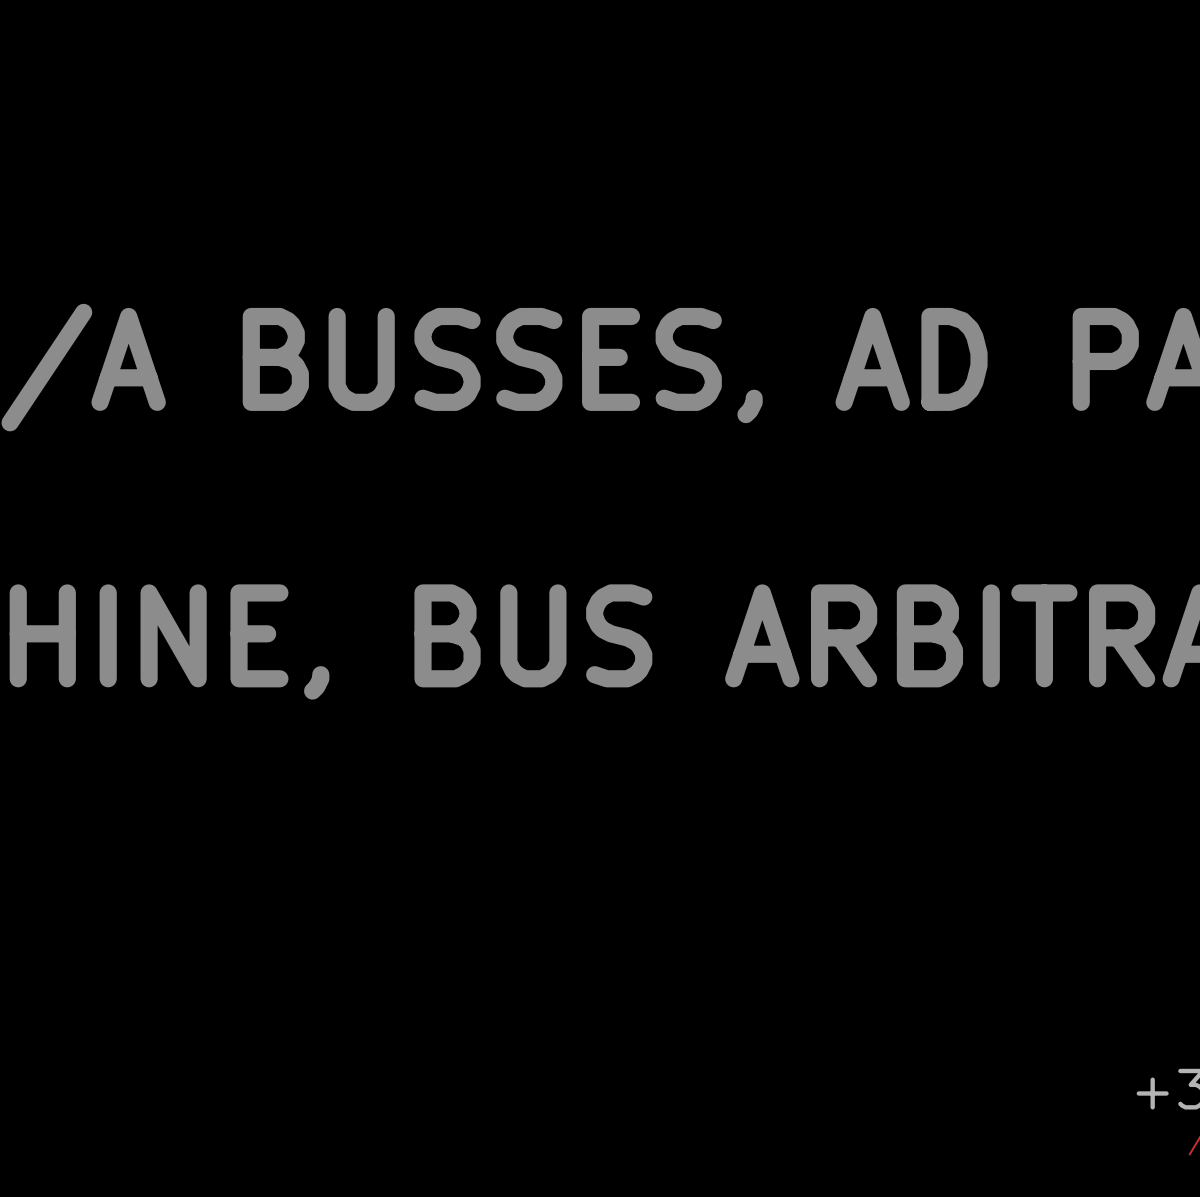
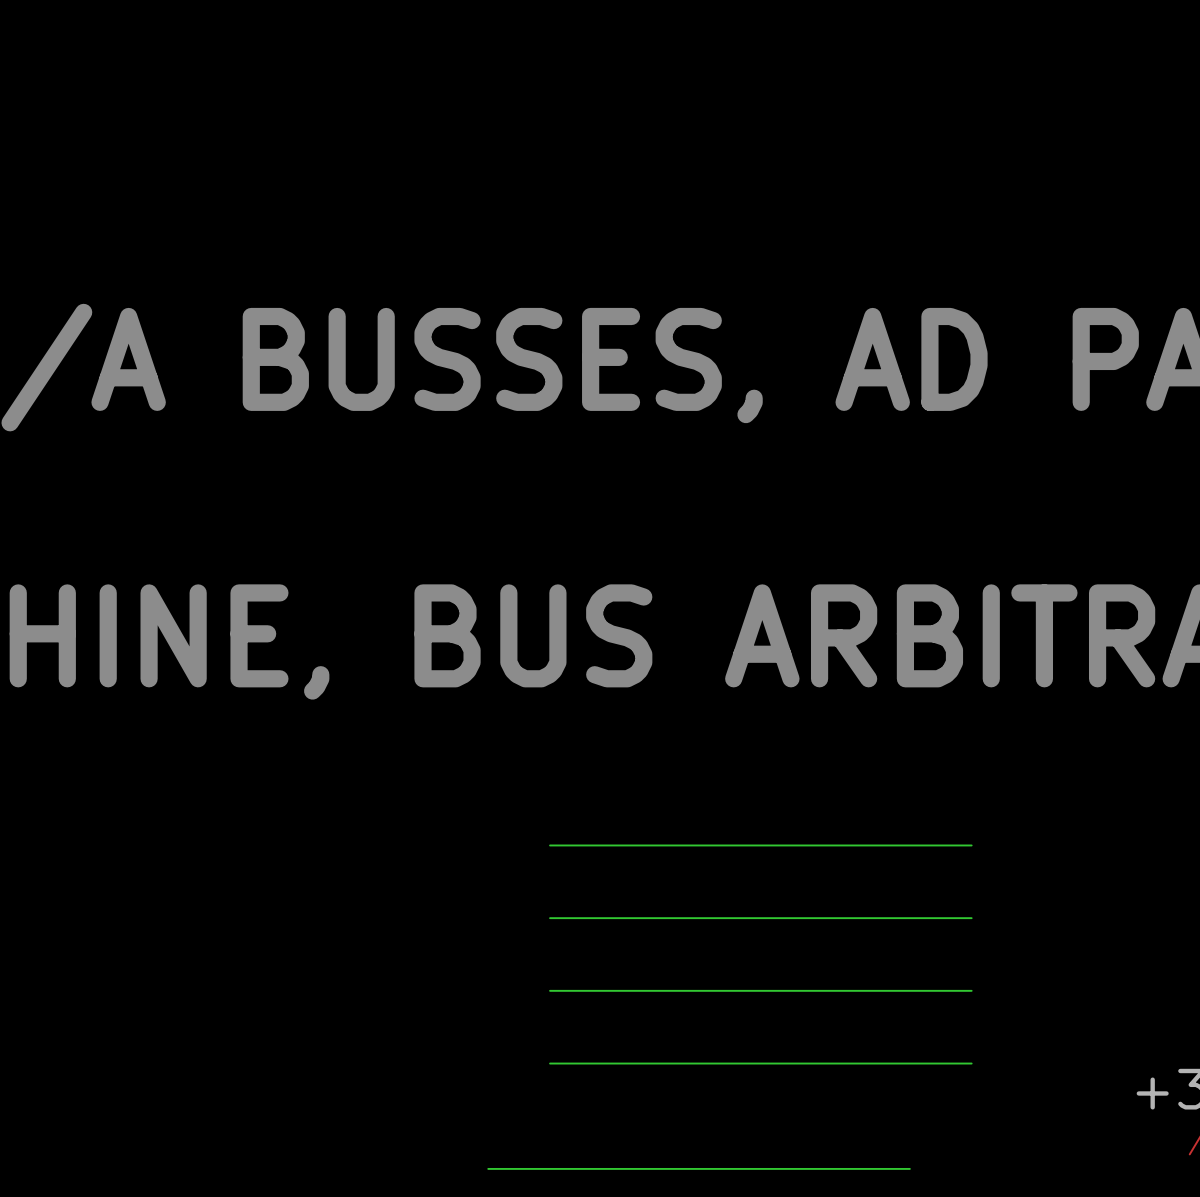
wire: none -> (550, 845) (971, 845)
wire: none -> (550, 918) (971, 918)
wire: none -> (550, 990) (971, 990)
wire: none -> (550, 1063) (971, 1063)
wire: none -> (488, 1168) (909, 1168)

